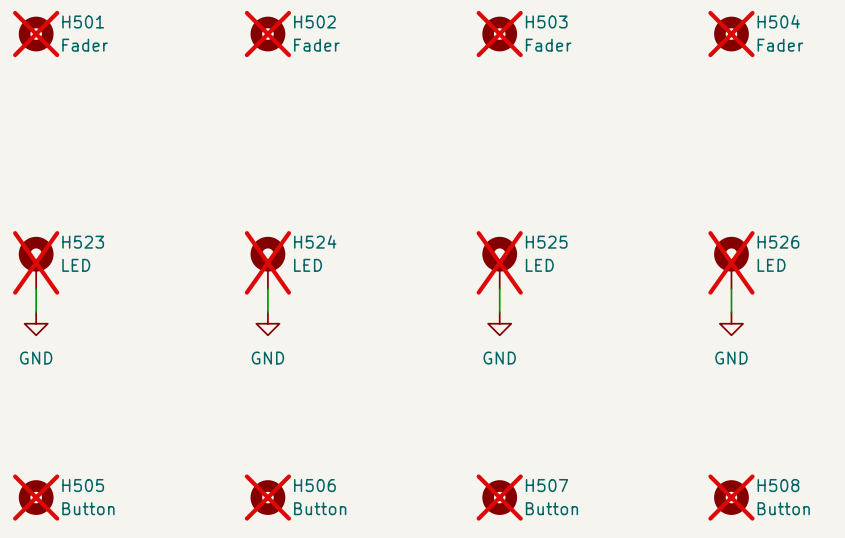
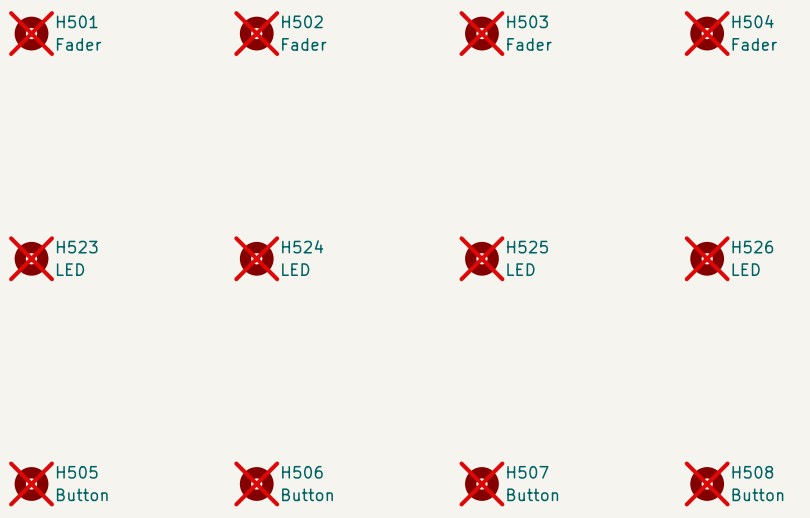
H523 symbol: [18, 236, 54, 289] -> [14, 241, 49, 276]
H524 symbol: [250, 236, 286, 289] -> [239, 241, 274, 276]
H525 symbol: [482, 236, 518, 289] -> [465, 241, 499, 276]
H526 symbol: [714, 236, 749, 289] -> [690, 241, 725, 276]
wire: (36, 288) (36, 312) -> none
wire: (267, 288) (267, 312) -> none
wire: (499, 288) (499, 312) -> none
wire: (731, 288) (731, 312) -> none
power symbol: GND (36, 323) -> none
power symbol: GND (267, 323) -> none
power symbol: GND (499, 323) -> none
power symbol: GND (731, 323) -> none

